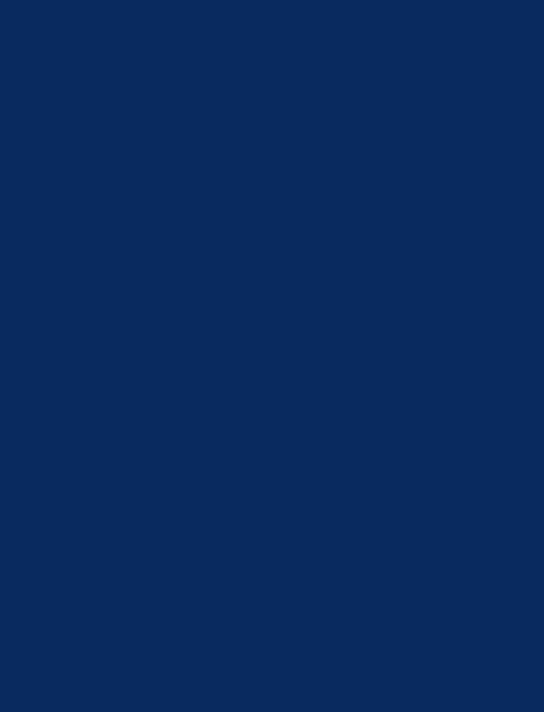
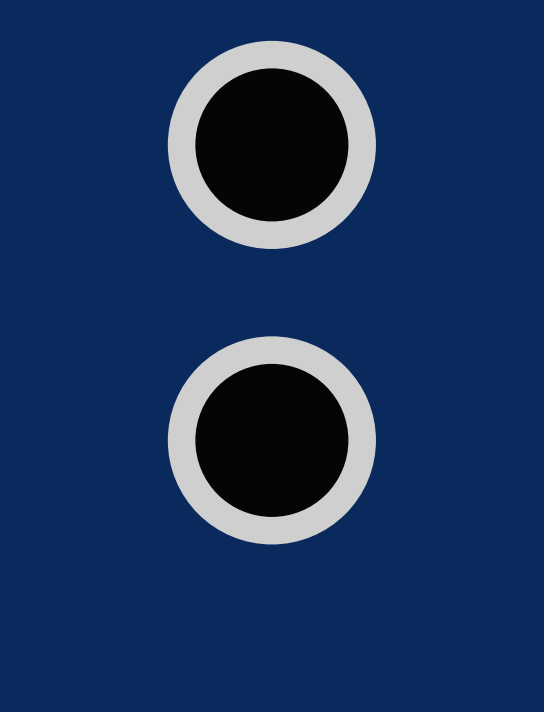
part: none -> (271, 144)
part: none -> (271, 440)

